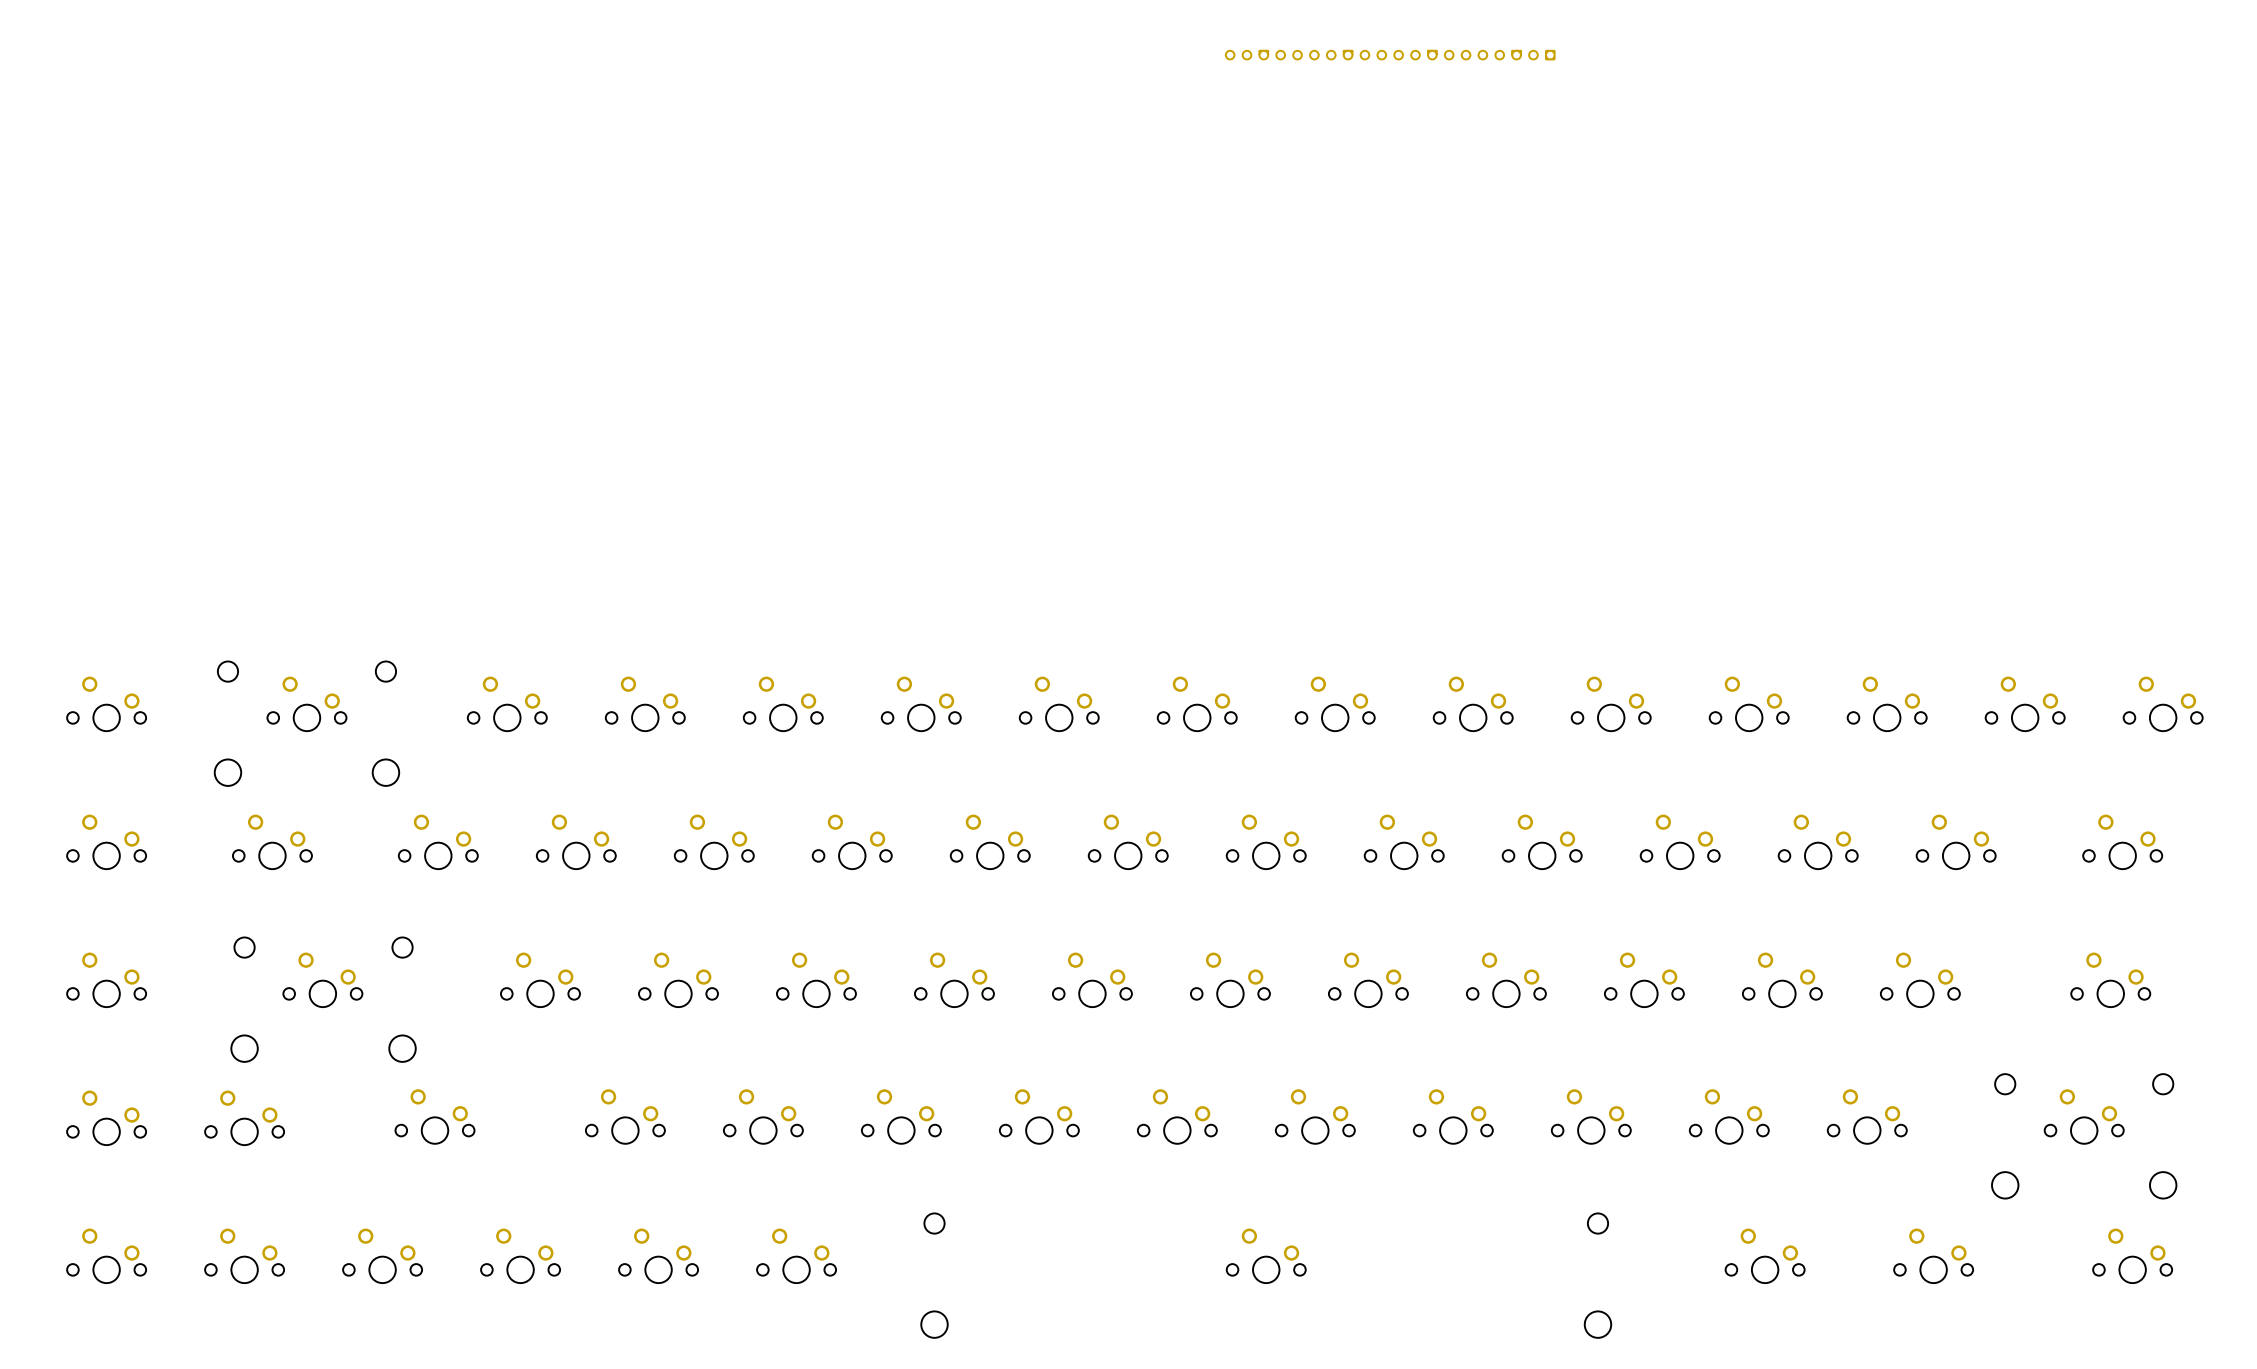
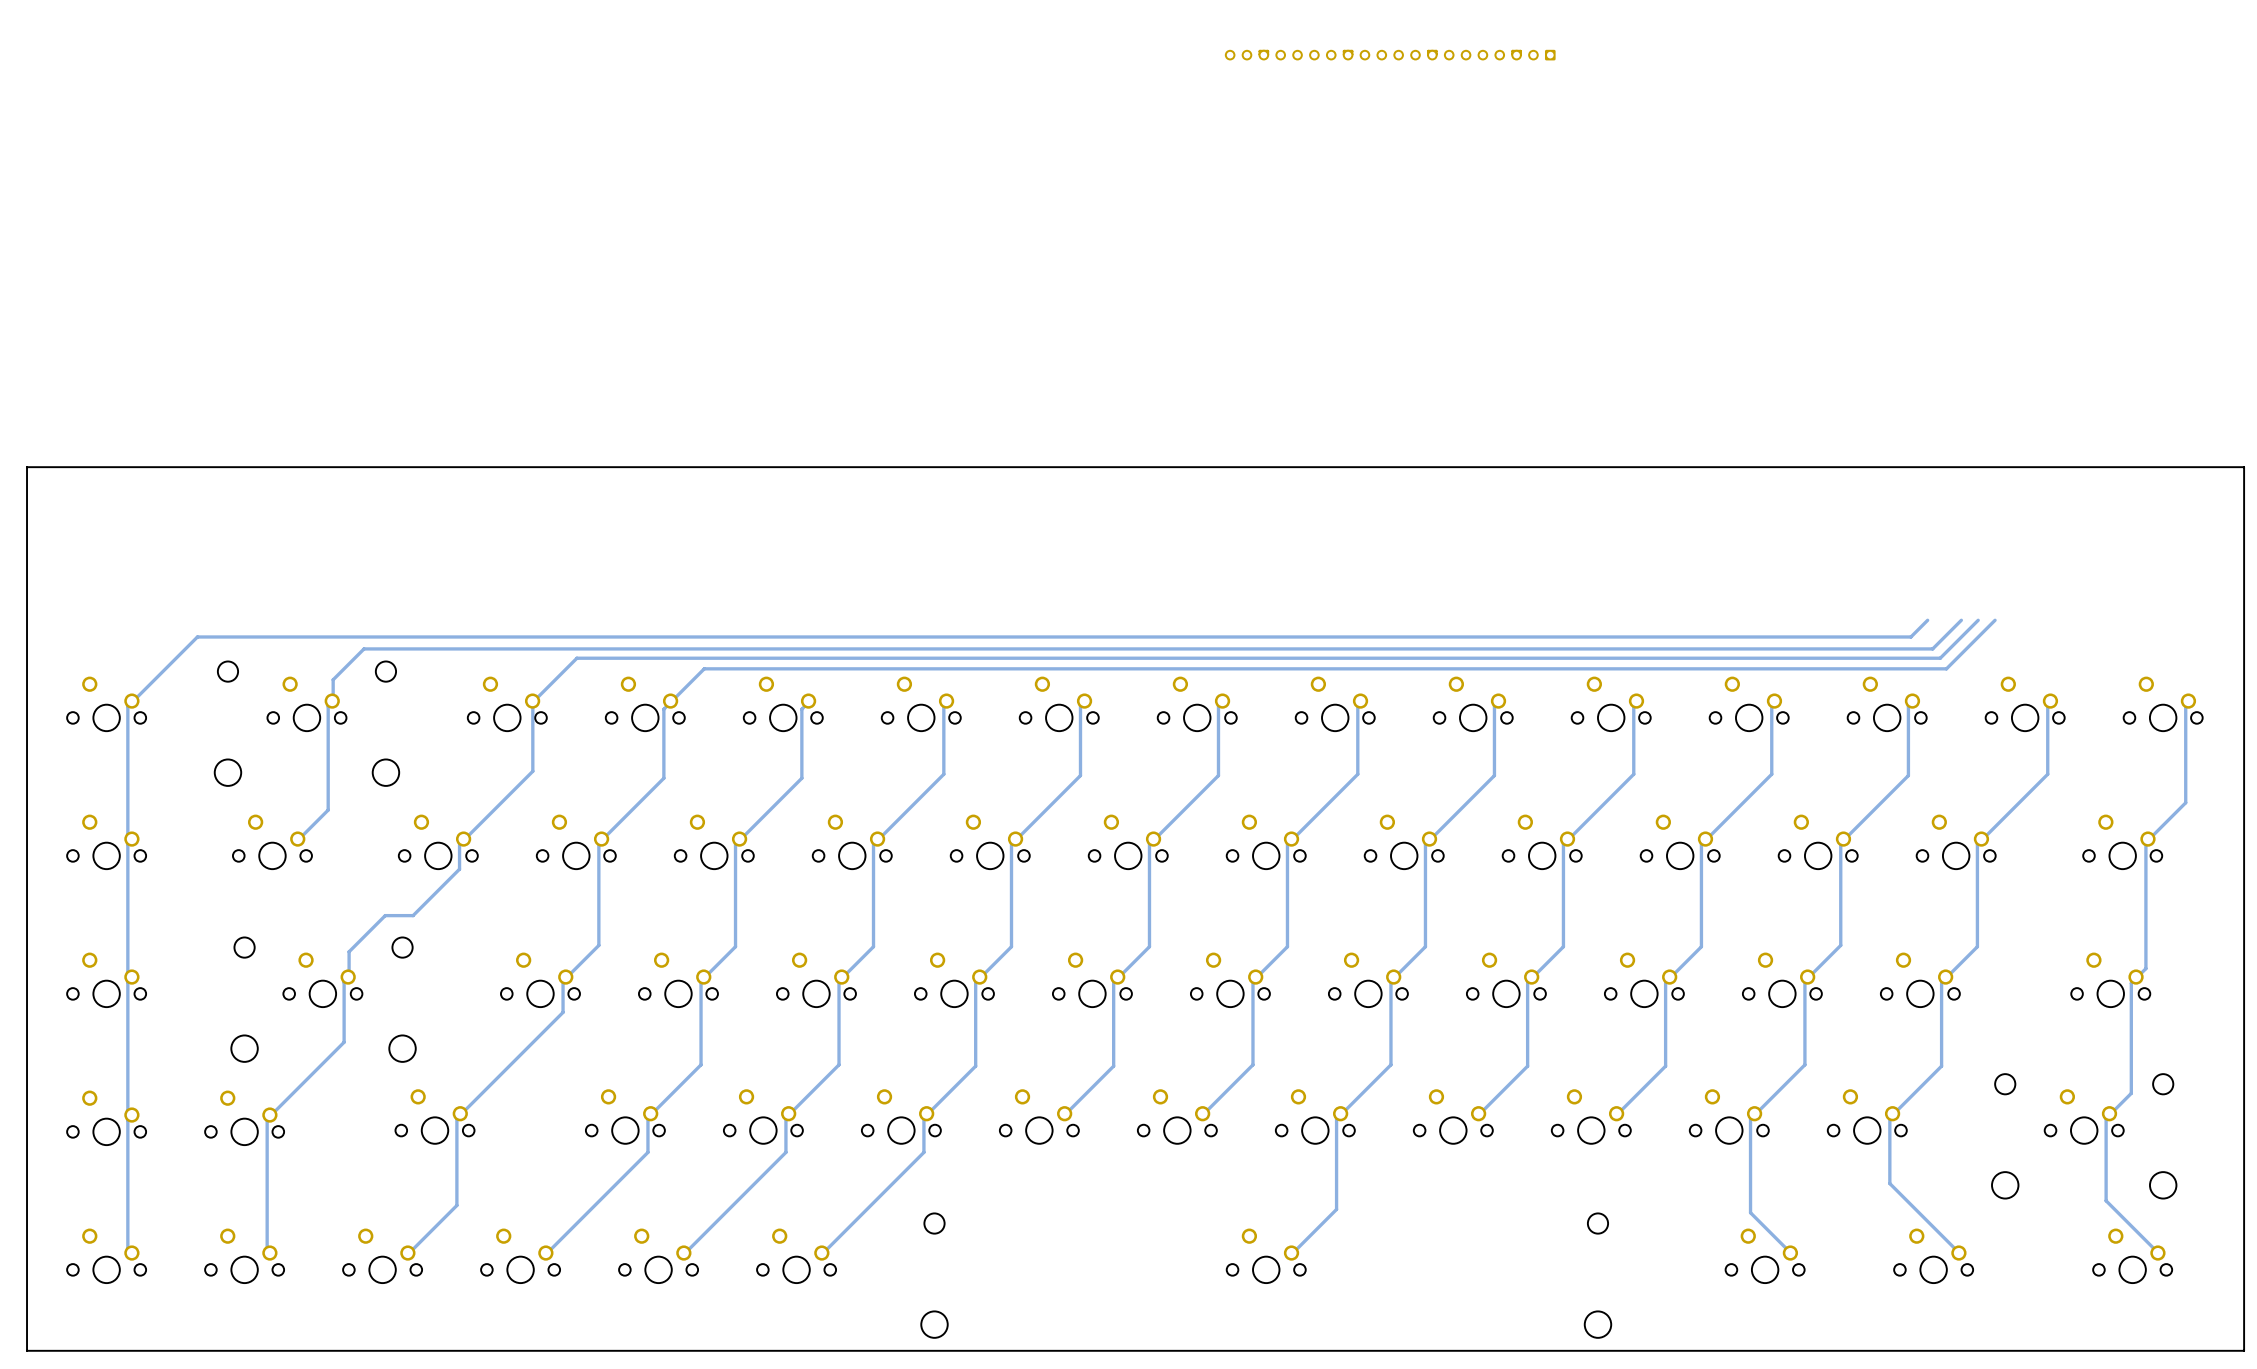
board edge: none -> (2244, 467) (27, 467) (27, 1350) (2244, 1350) (2244, 467)
track: none -> (1927, 620) (1910, 636) (197, 636) (127, 706) (127, 834) (132, 839) (127, 844) (127, 972) (132, 977) (127, 982) (127, 1110) (132, 1115) (127, 1120) (127, 1248) (132, 1253)
track: none -> (1961, 620) (1932, 648) (364, 648) (333, 679) (333, 701) (328, 706) (328, 810) (298, 839)
track: none -> (1978, 620) (1940, 658) (576, 658) (532, 702) (532, 771) (459, 844) (459, 869) (413, 915) (385, 915) (349, 951) (349, 977) (344, 982) (344, 1042) (267, 1119) (267, 1249) (270, 1253)
track: none -> (1995, 620) (1946, 668) (704, 668) (663, 709) (663, 778) (598, 843) (598, 945) (563, 981) (563, 1012) (456, 1118) (456, 1205) (408, 1253)
track: none -> (809, 701) (801, 709) (801, 778) (735, 844) (735, 946) (701, 981) (701, 1064) (647, 1117) (647, 1152) (546, 1253)
track: none -> (947, 701) (943, 705) (943, 774) (873, 844) (873, 946) (839, 981) (839, 1064) (785, 1117) (785, 1152) (684, 1253)
track: none -> (1085, 701) (1080, 706) (1080, 775) (1011, 844) (1011, 946) (975, 982) (975, 1066) (923, 1117) (923, 1152) (822, 1253)
track: none -> (1223, 701) (1218, 706) (1218, 775) (1149, 844) (1149, 946) (1113, 982) (1113, 1066) (1065, 1114)
track: none -> (1361, 701) (1357, 705) (1357, 774) (1287, 844) (1287, 946) (1252, 981) (1252, 1064) (1203, 1114)
track: none -> (1499, 701) (1494, 706) (1494, 775) (1425, 844) (1425, 946) (1390, 981) (1390, 1064) (1336, 1119) (1336, 1209) (1292, 1253)
track: none -> (1637, 701) (1633, 705) (1633, 774) (1563, 844) (1563, 946) (1527, 982) (1527, 1066) (1479, 1114)
track: none -> (1775, 701) (1771, 705) (1771, 774) (1701, 844) (1701, 946) (1665, 982) (1665, 1066) (1617, 1114)
track: none -> (1913, 701) (1908, 706) (1908, 775) (1840, 843) (1840, 945) (1804, 981) (1804, 1064) (1750, 1119) (1750, 1212) (1791, 1253)
track: none -> (2051, 701) (2047, 705) (2047, 774) (1977, 844) (1977, 946) (1941, 982) (1941, 1066) (1889, 1117) (1889, 1183) (1959, 1253)
track: none -> (2189, 701) (2185, 705) (2185, 802) (2145, 842) (2145, 968) (2131, 983) (2131, 1093) (2106, 1118) (2106, 1200) (2158, 1253)

